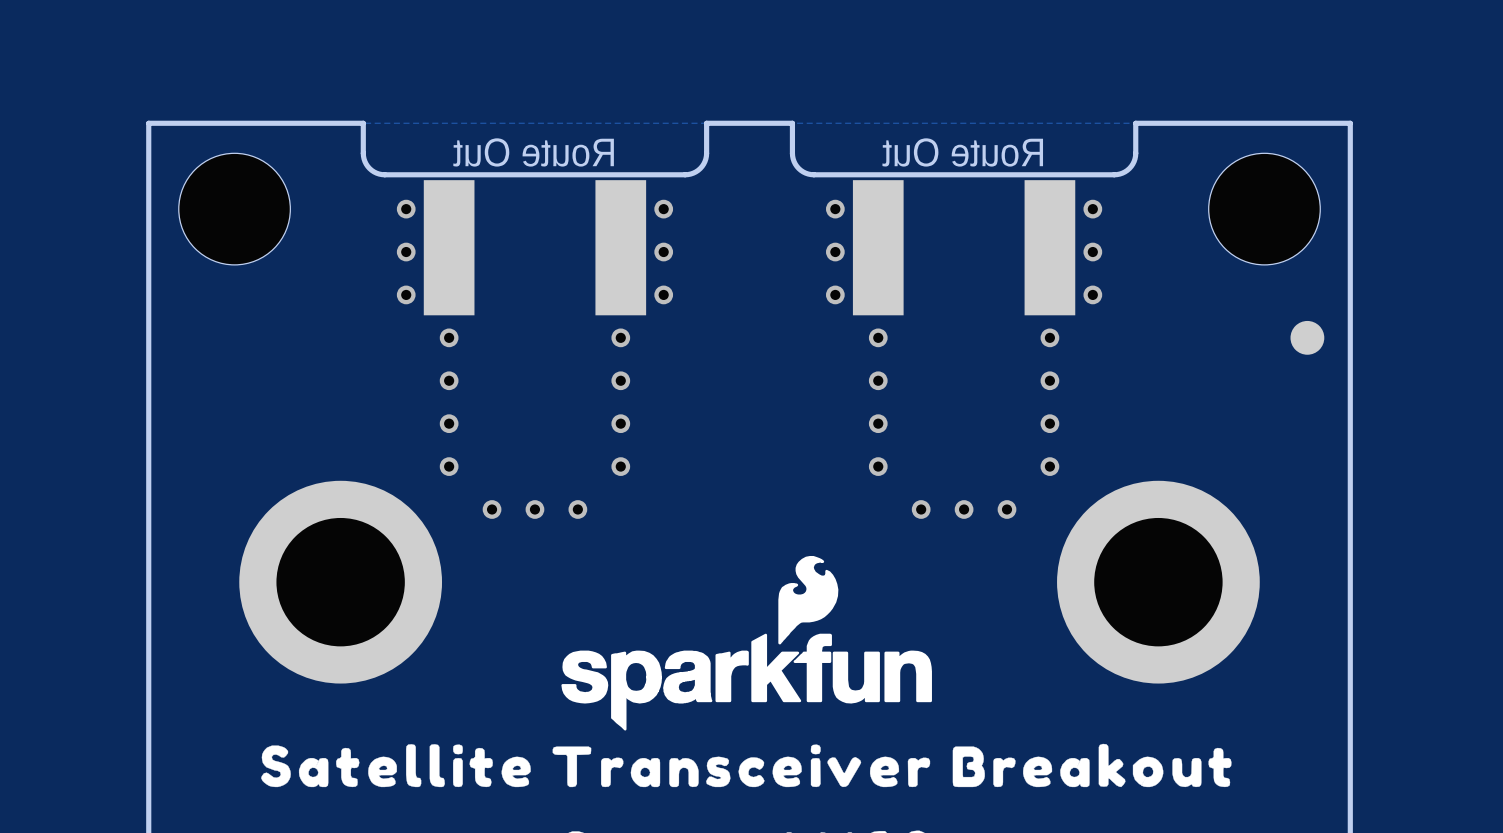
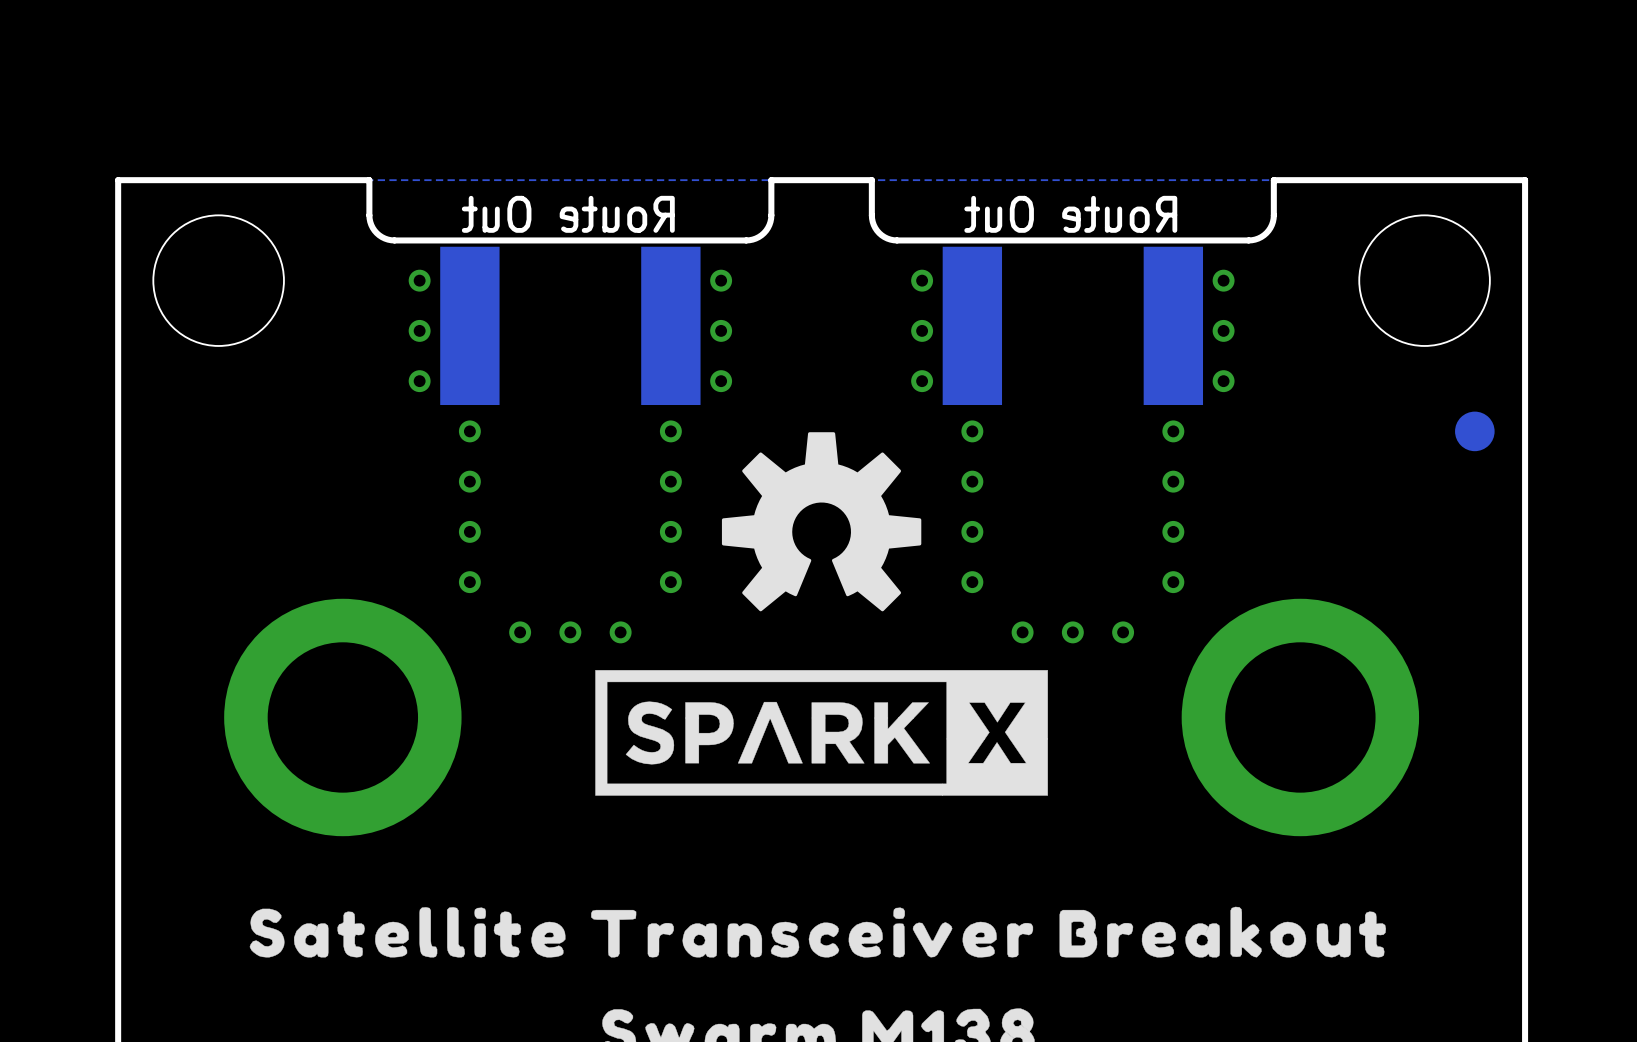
drawing: none -> [721, 432, 922, 612]
drawing: none -> [595, 670, 1048, 796]
drawing: [561, 555, 932, 731] -> none

